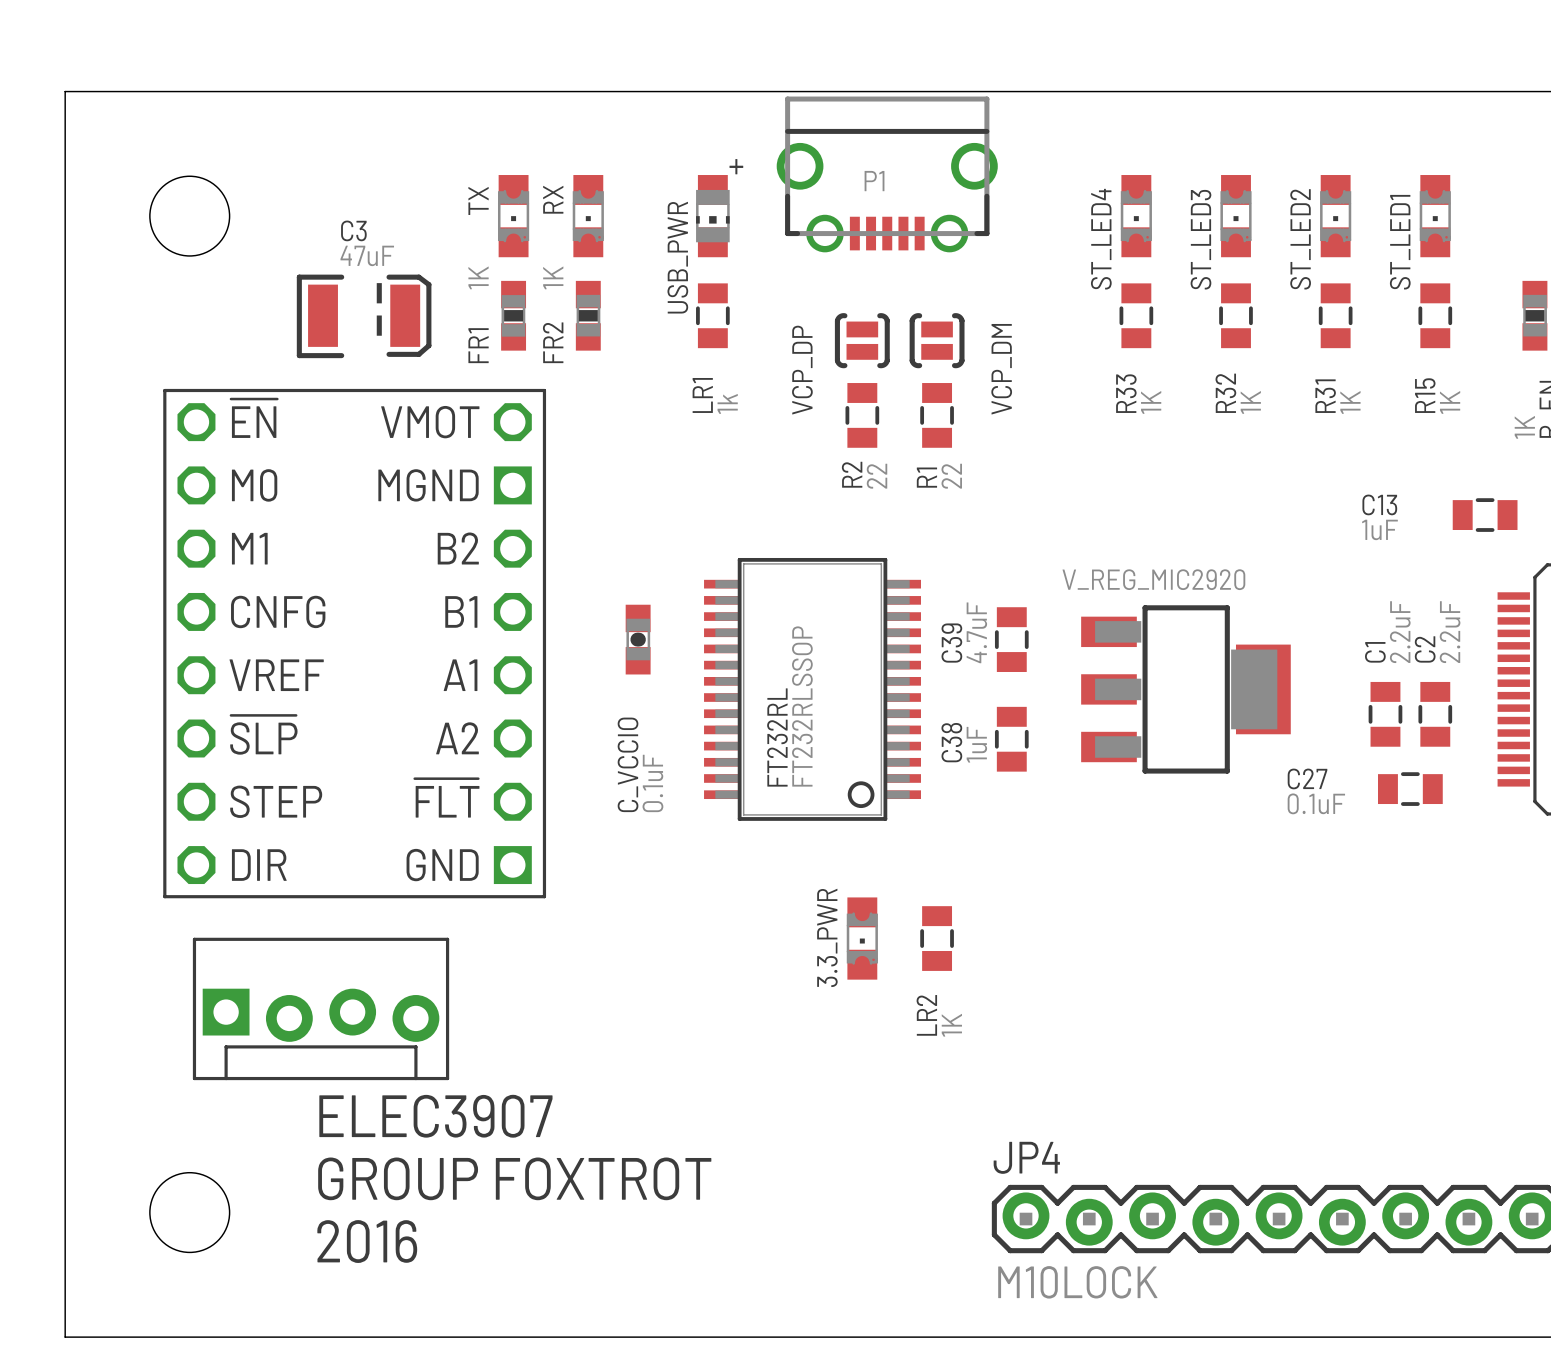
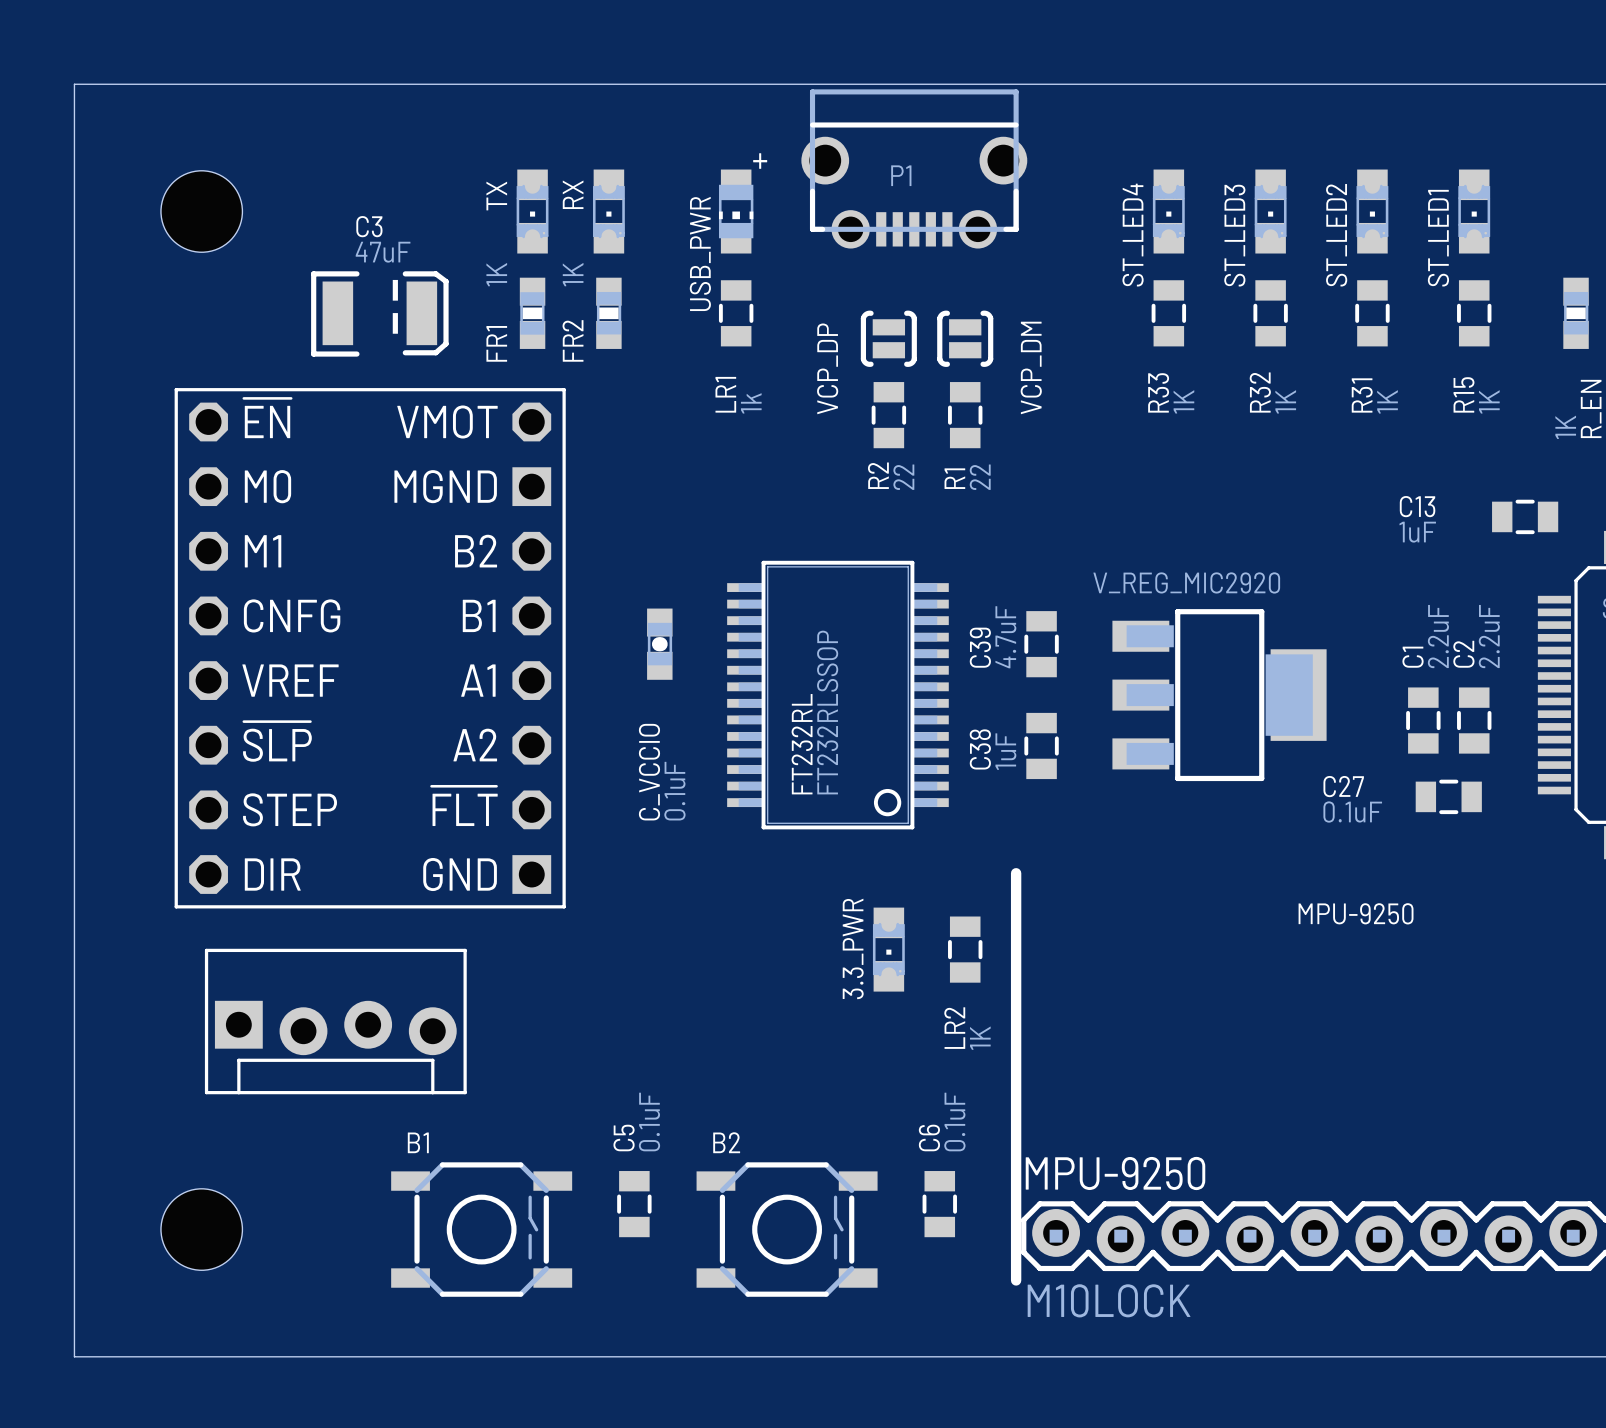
line: none -> (1016, 873) (1016, 1280)
text: none -> MPU-9250 (1356, 913)
text: ELEC3907 (435, 1116) -> none
JP4 name: JP4 (1026, 1157) -> MPU-9250 (1115, 1173)
text: GROUP FOXTROT (514, 1178) -> none
C5: none -> 0.1uF (634, 1204)
C6: none -> 0.1uF (939, 1204)
B1: none -> (481, 1229)
B2: none -> (787, 1229)
text: 2016 (367, 1241) -> none

